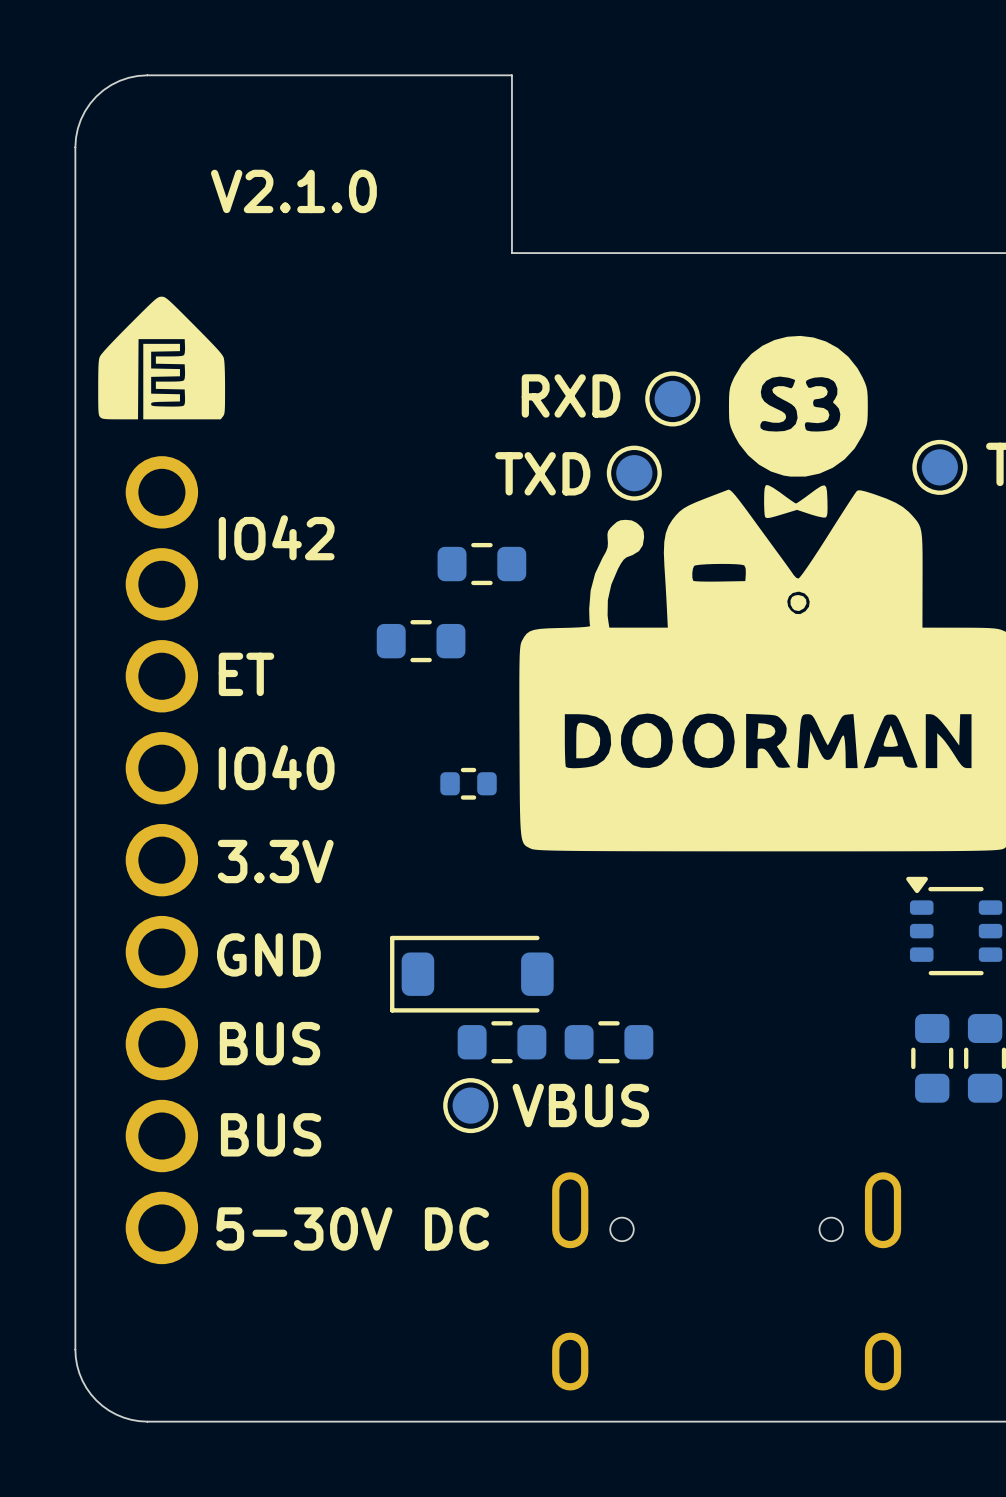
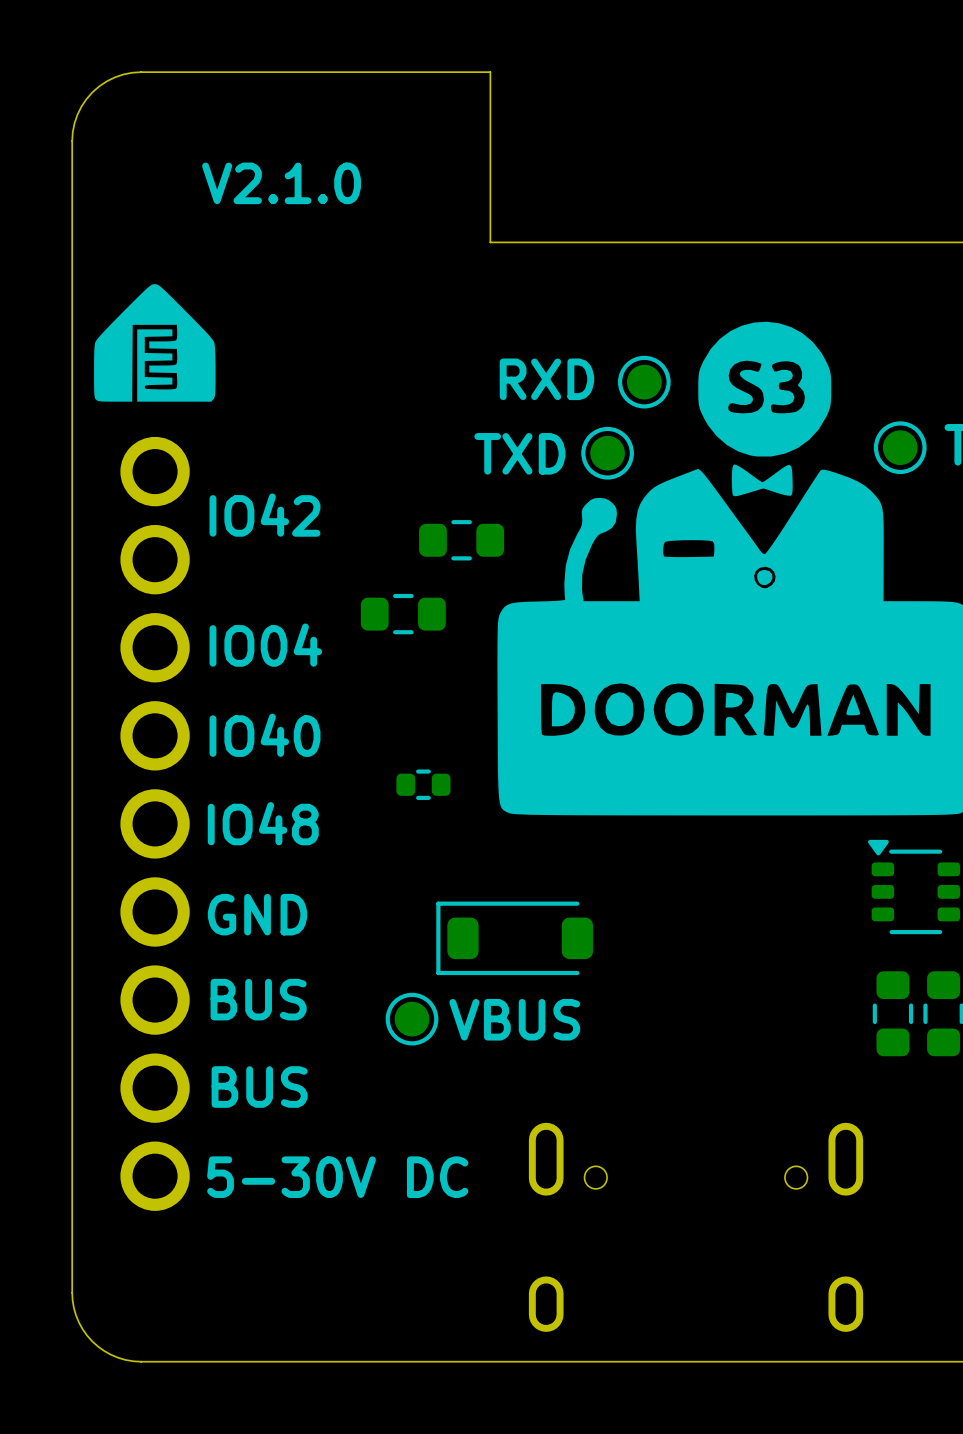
text: ET (246, 674) -> IO04 (265, 645)
part position: (468, 783) -> (423, 784)
text: 3.3V (275, 861) -> IO48 (263, 823)
part position: (471, 974) -> (514, 938)
part: (502, 1042) -> none
part: (608, 1042) -> none
part position: (470, 1105) -> (412, 1019)
text position: VBUS (580, 1105) -> VBUS (514, 1019)

